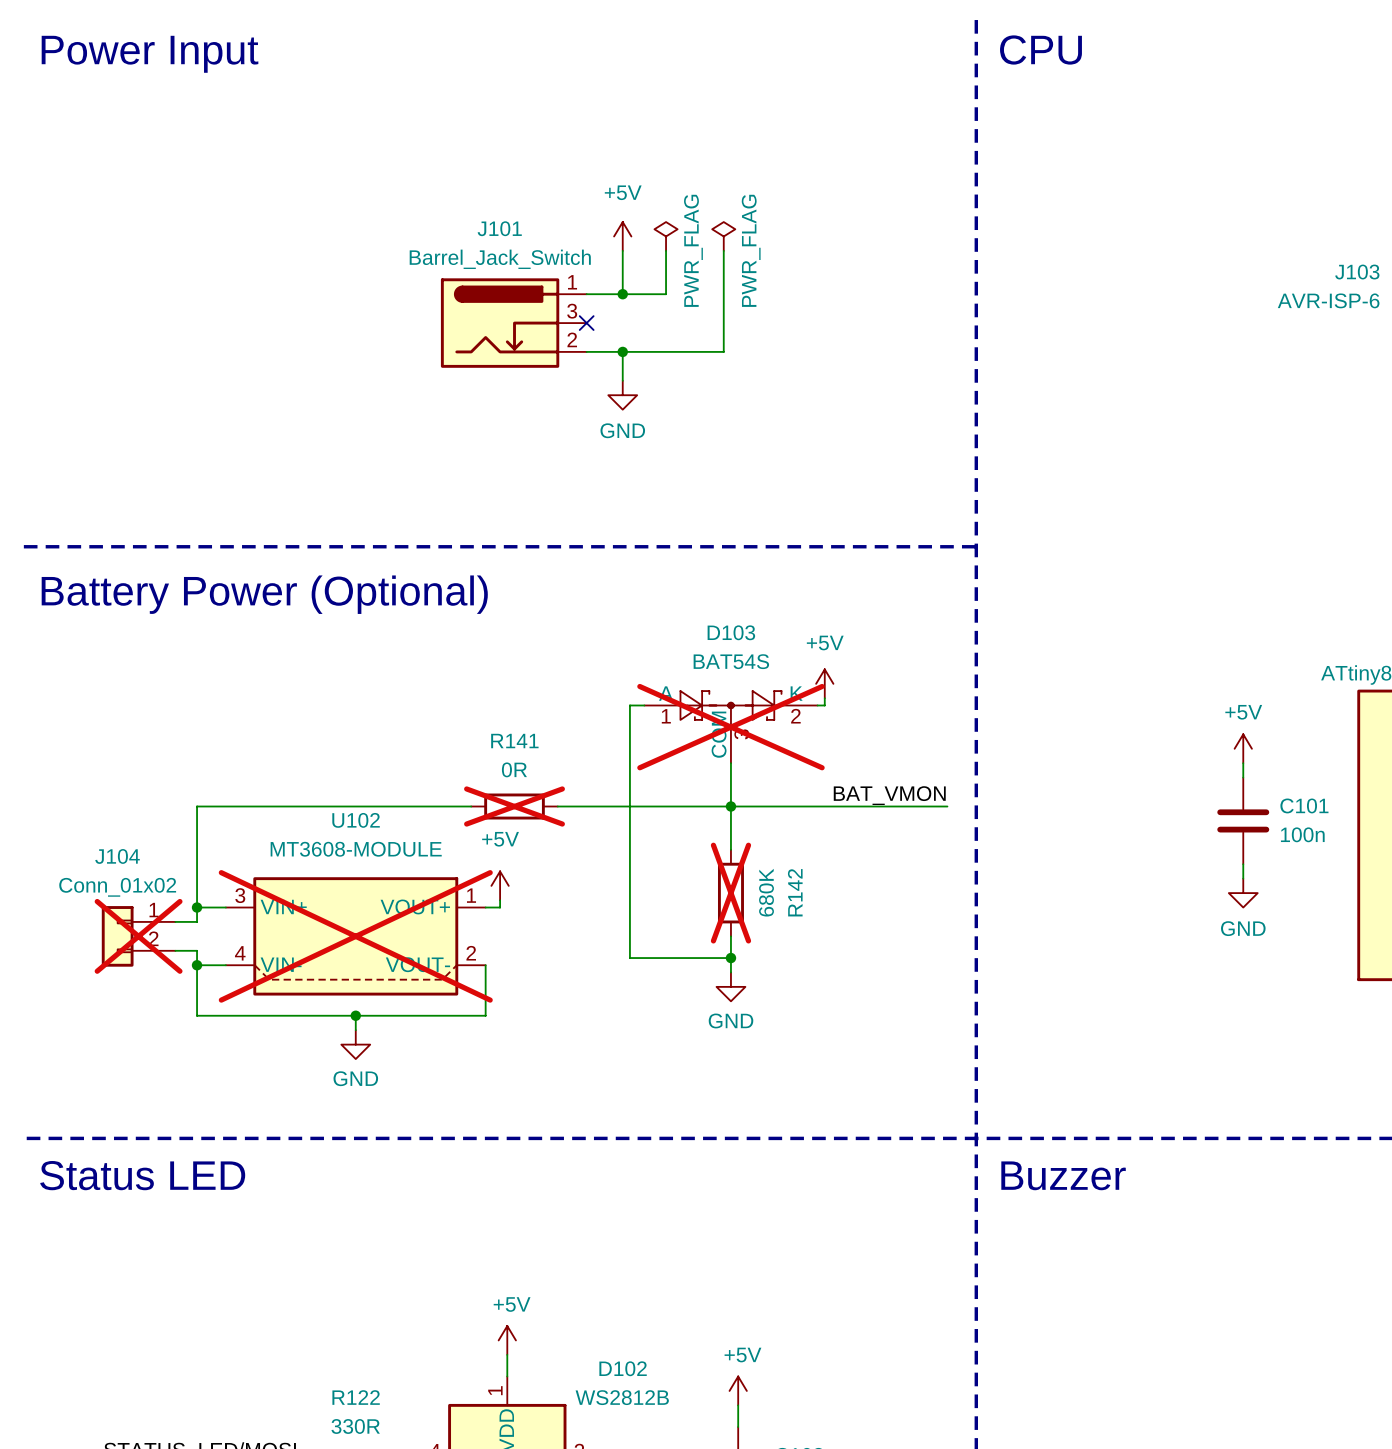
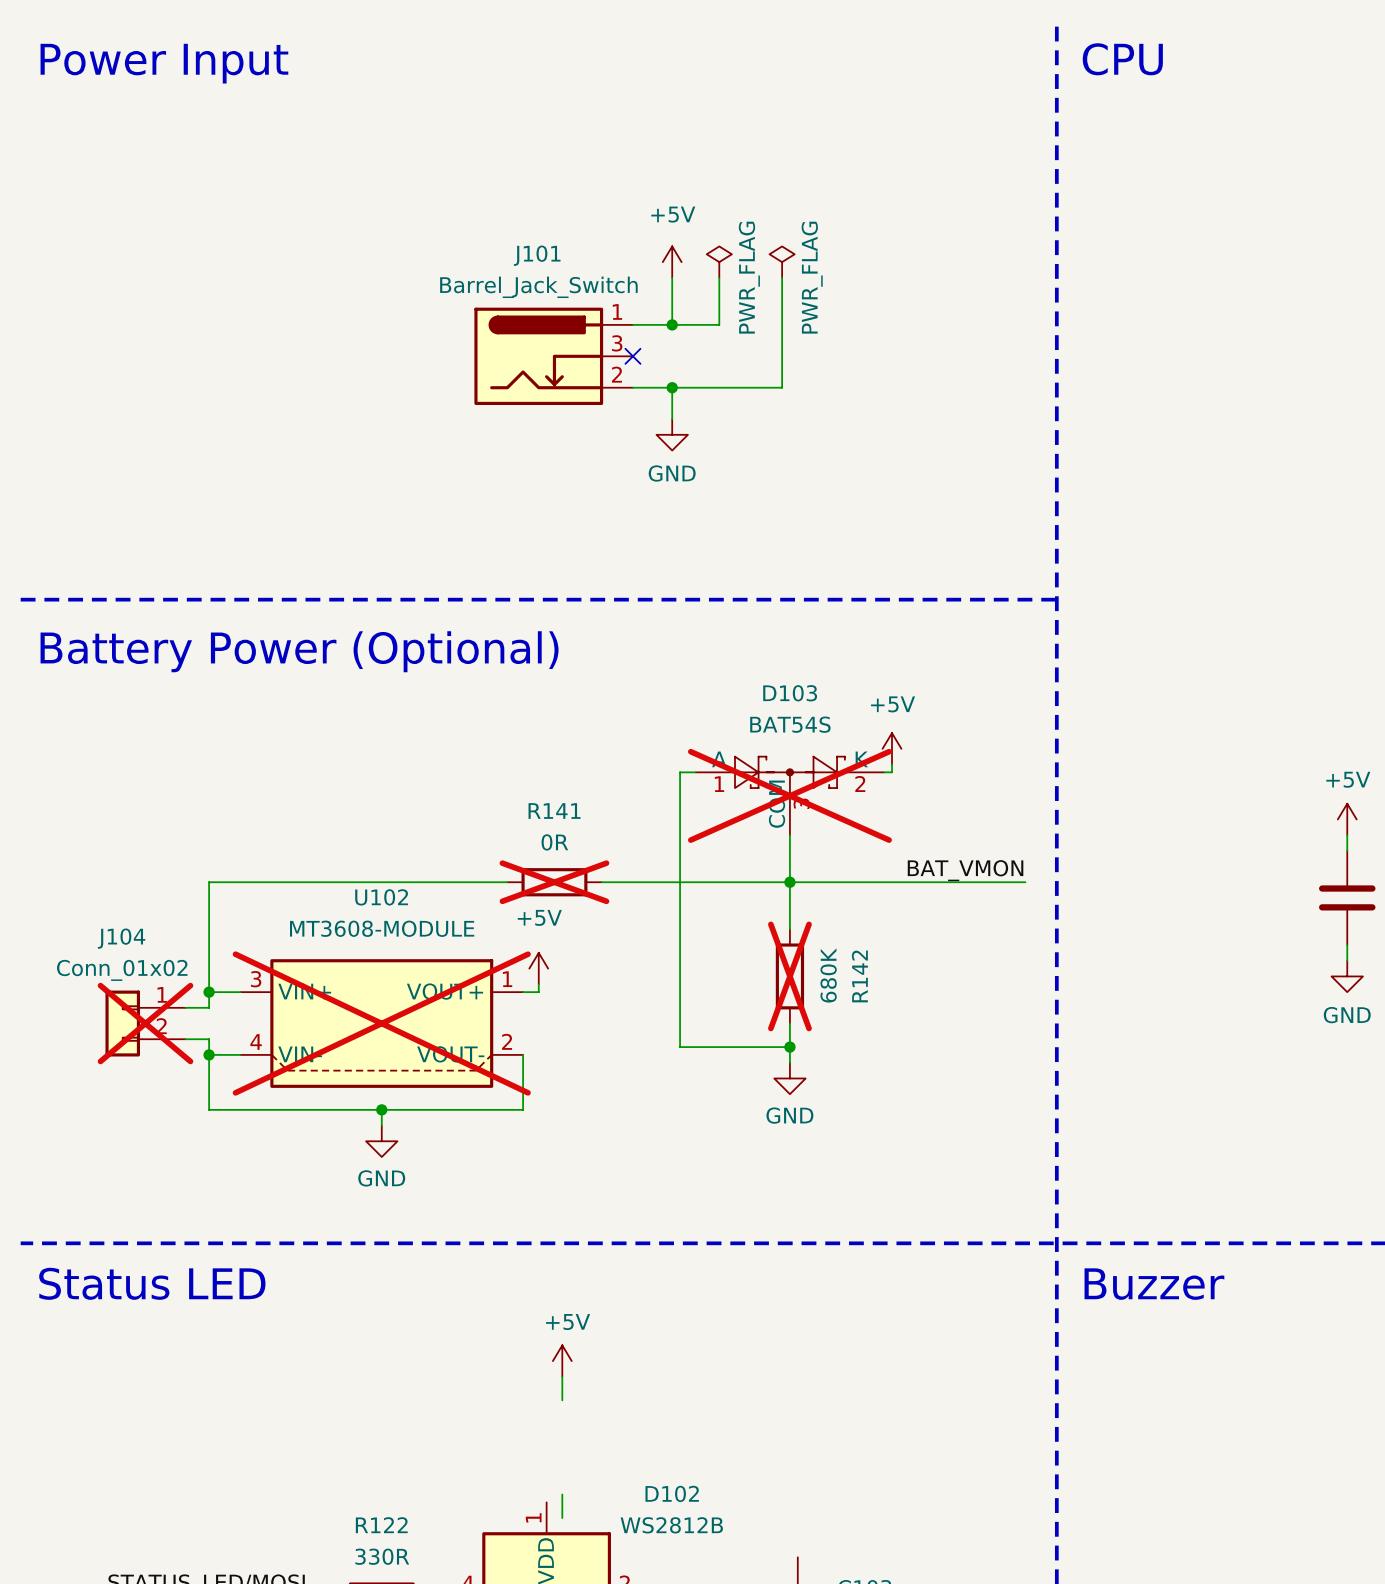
power symbol position: +5V (507, 1340) -> +5V (562, 1361)
wire: (507, 1354) (507, 1376) -> (562, 1376) (562, 1400)
power symbol: +5V (738, 1390) -> none
wire: (738, 1405) (738, 1427) -> (562, 1494) (562, 1518)

